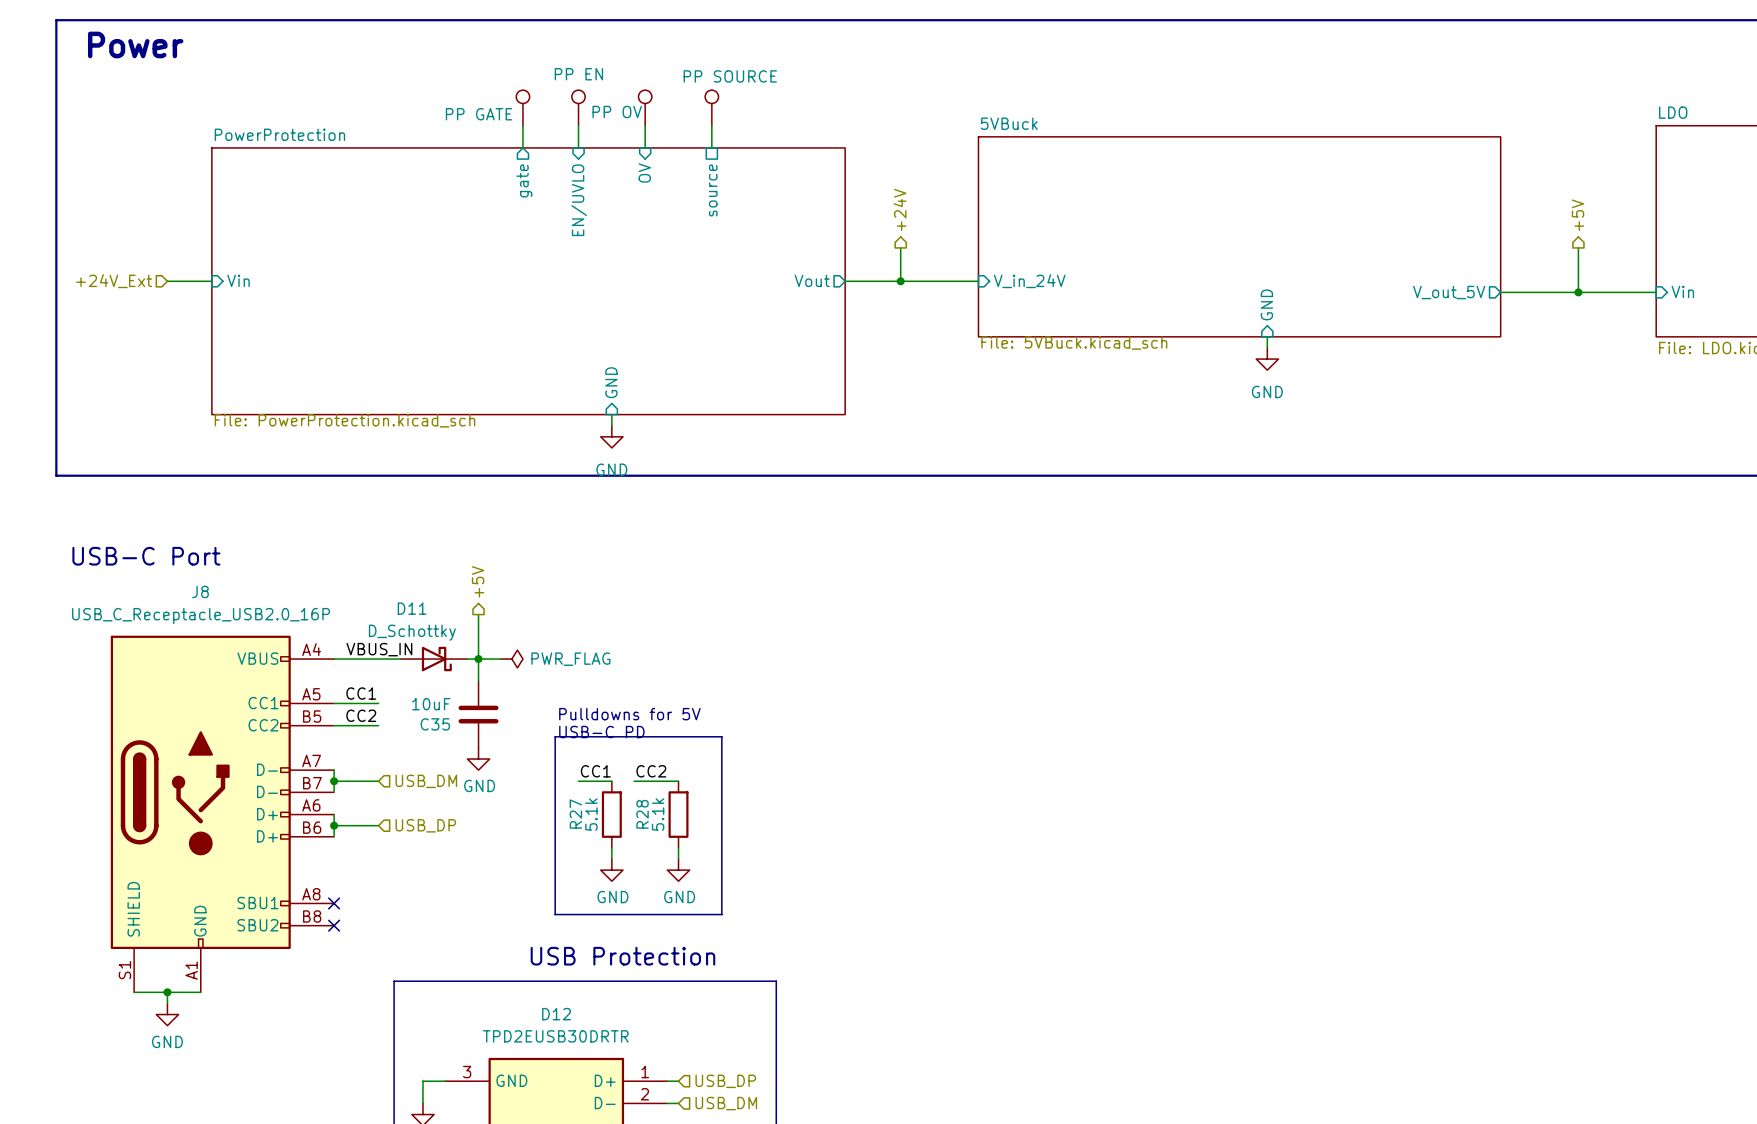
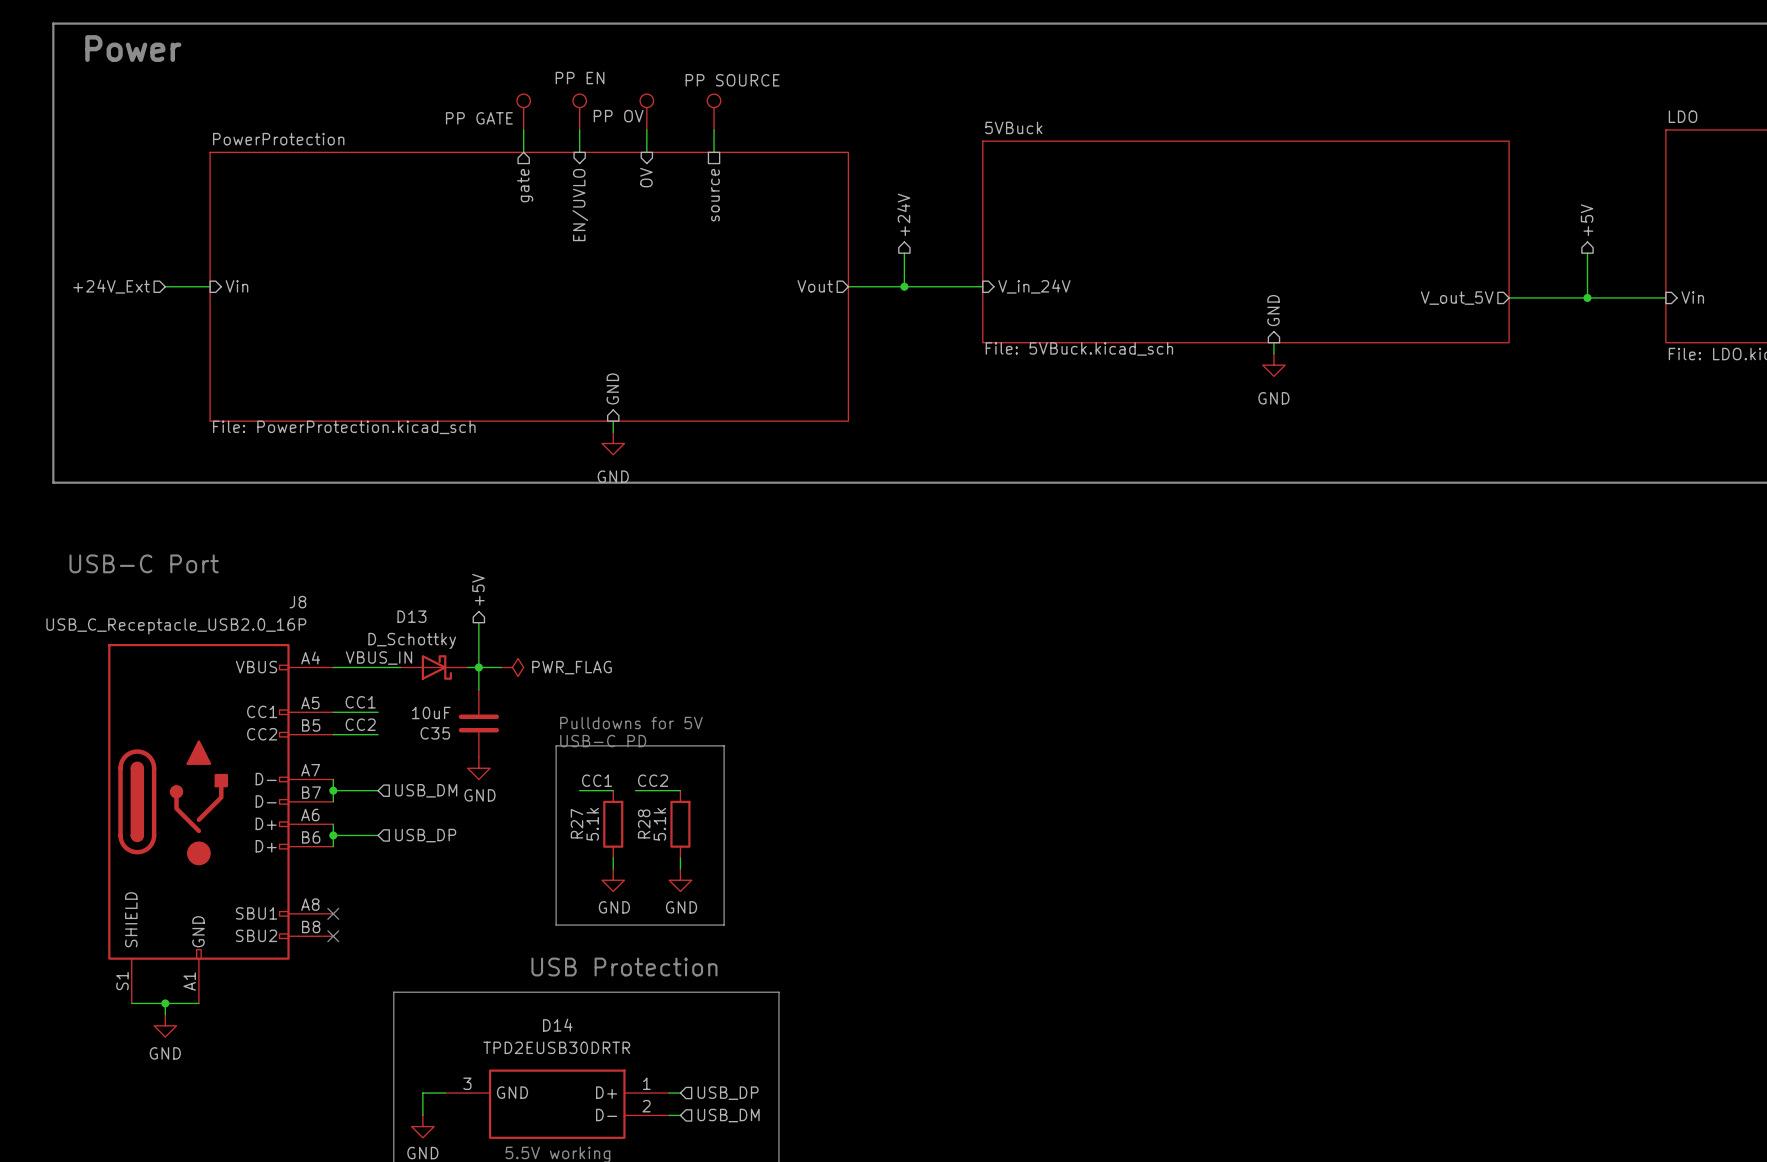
J8 name position: J8 (200, 591) -> J8 (297, 602)
D11 name: D11 (412, 608) -> D13 (411, 616)
J8 value position: USB_C_Receptacle_USB2.0_16P (201, 616) -> USB_C_Receptacle_USB2.0_16P (176, 626)
D12 name: D12 (556, 1014) -> D14 (557, 1025)

